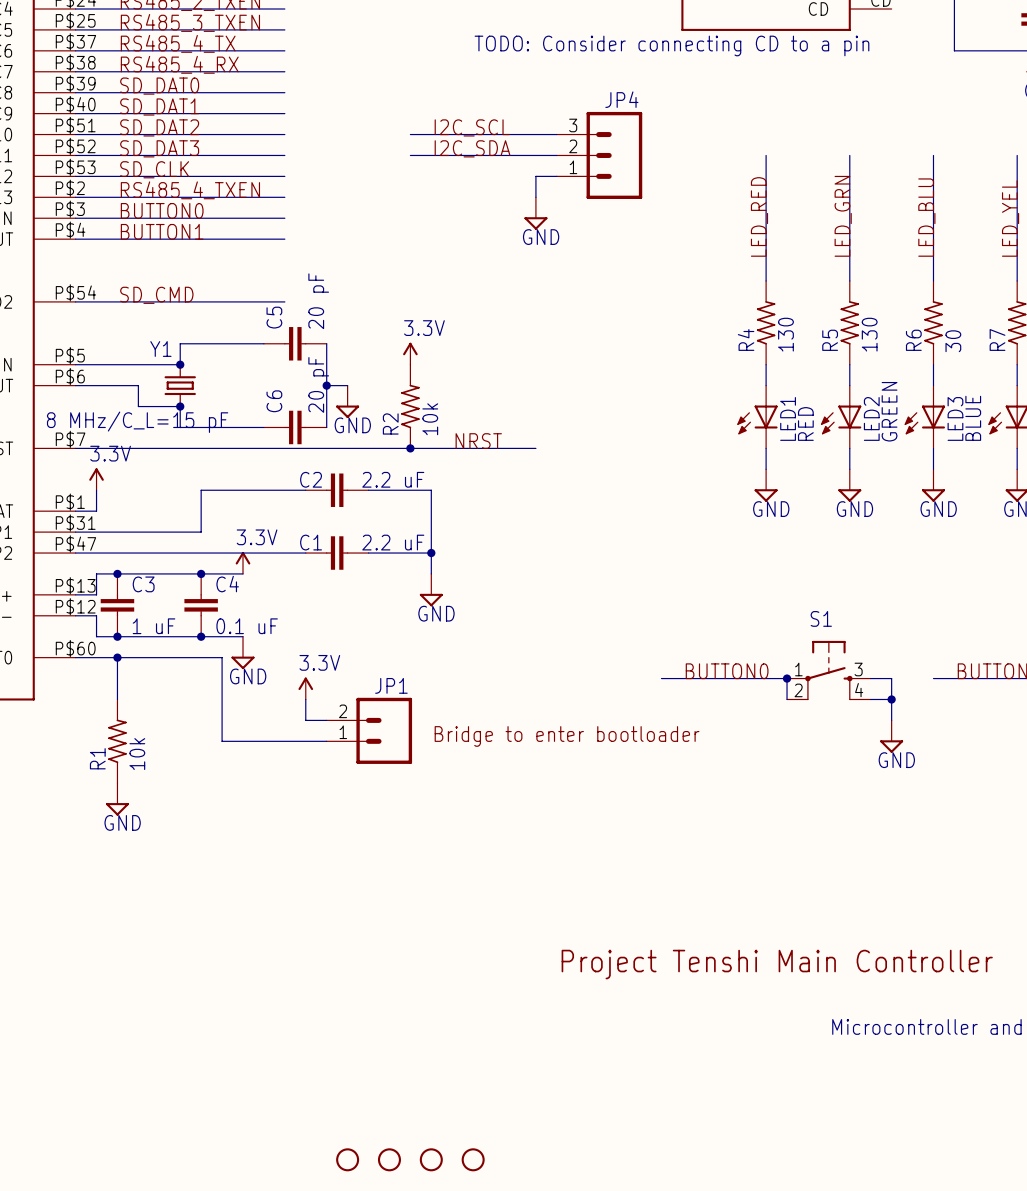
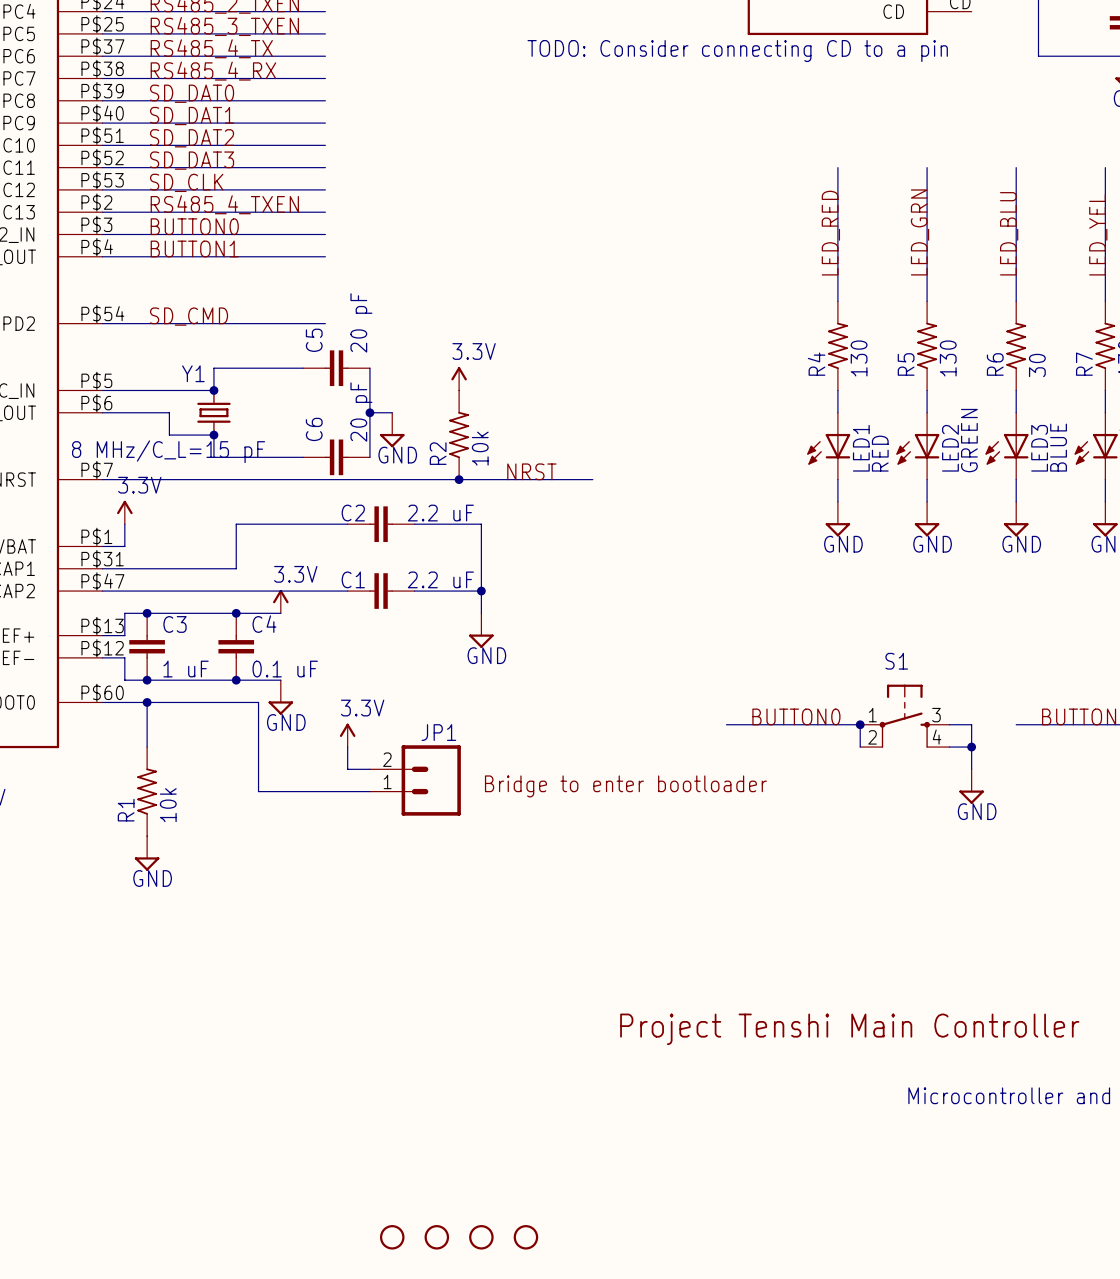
label: I2C_SCL (472, 127) -> none
wire: (410, 134) (556, 134) -> none
label: I2C_SDA (472, 148) -> none
wire: (410, 155) (556, 155) -> none
JP4: (599, 155) -> none
wire: (556, 176) (535, 176) (535, 197) -> none
power symbol: GND (535, 213) -> none

